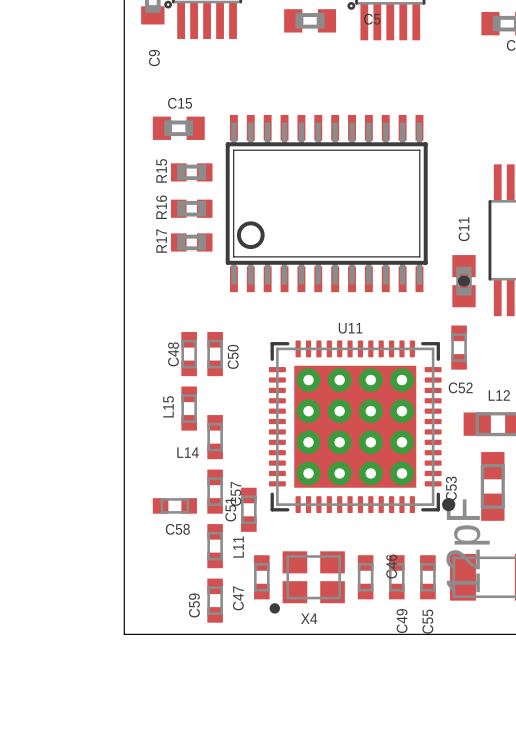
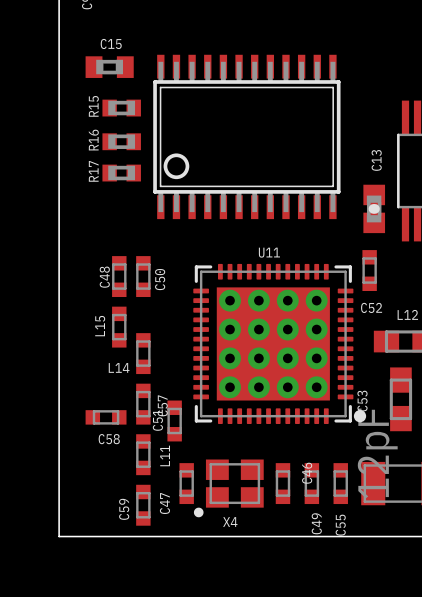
C11 name: C11 (464, 229) -> C13 (376, 160)

